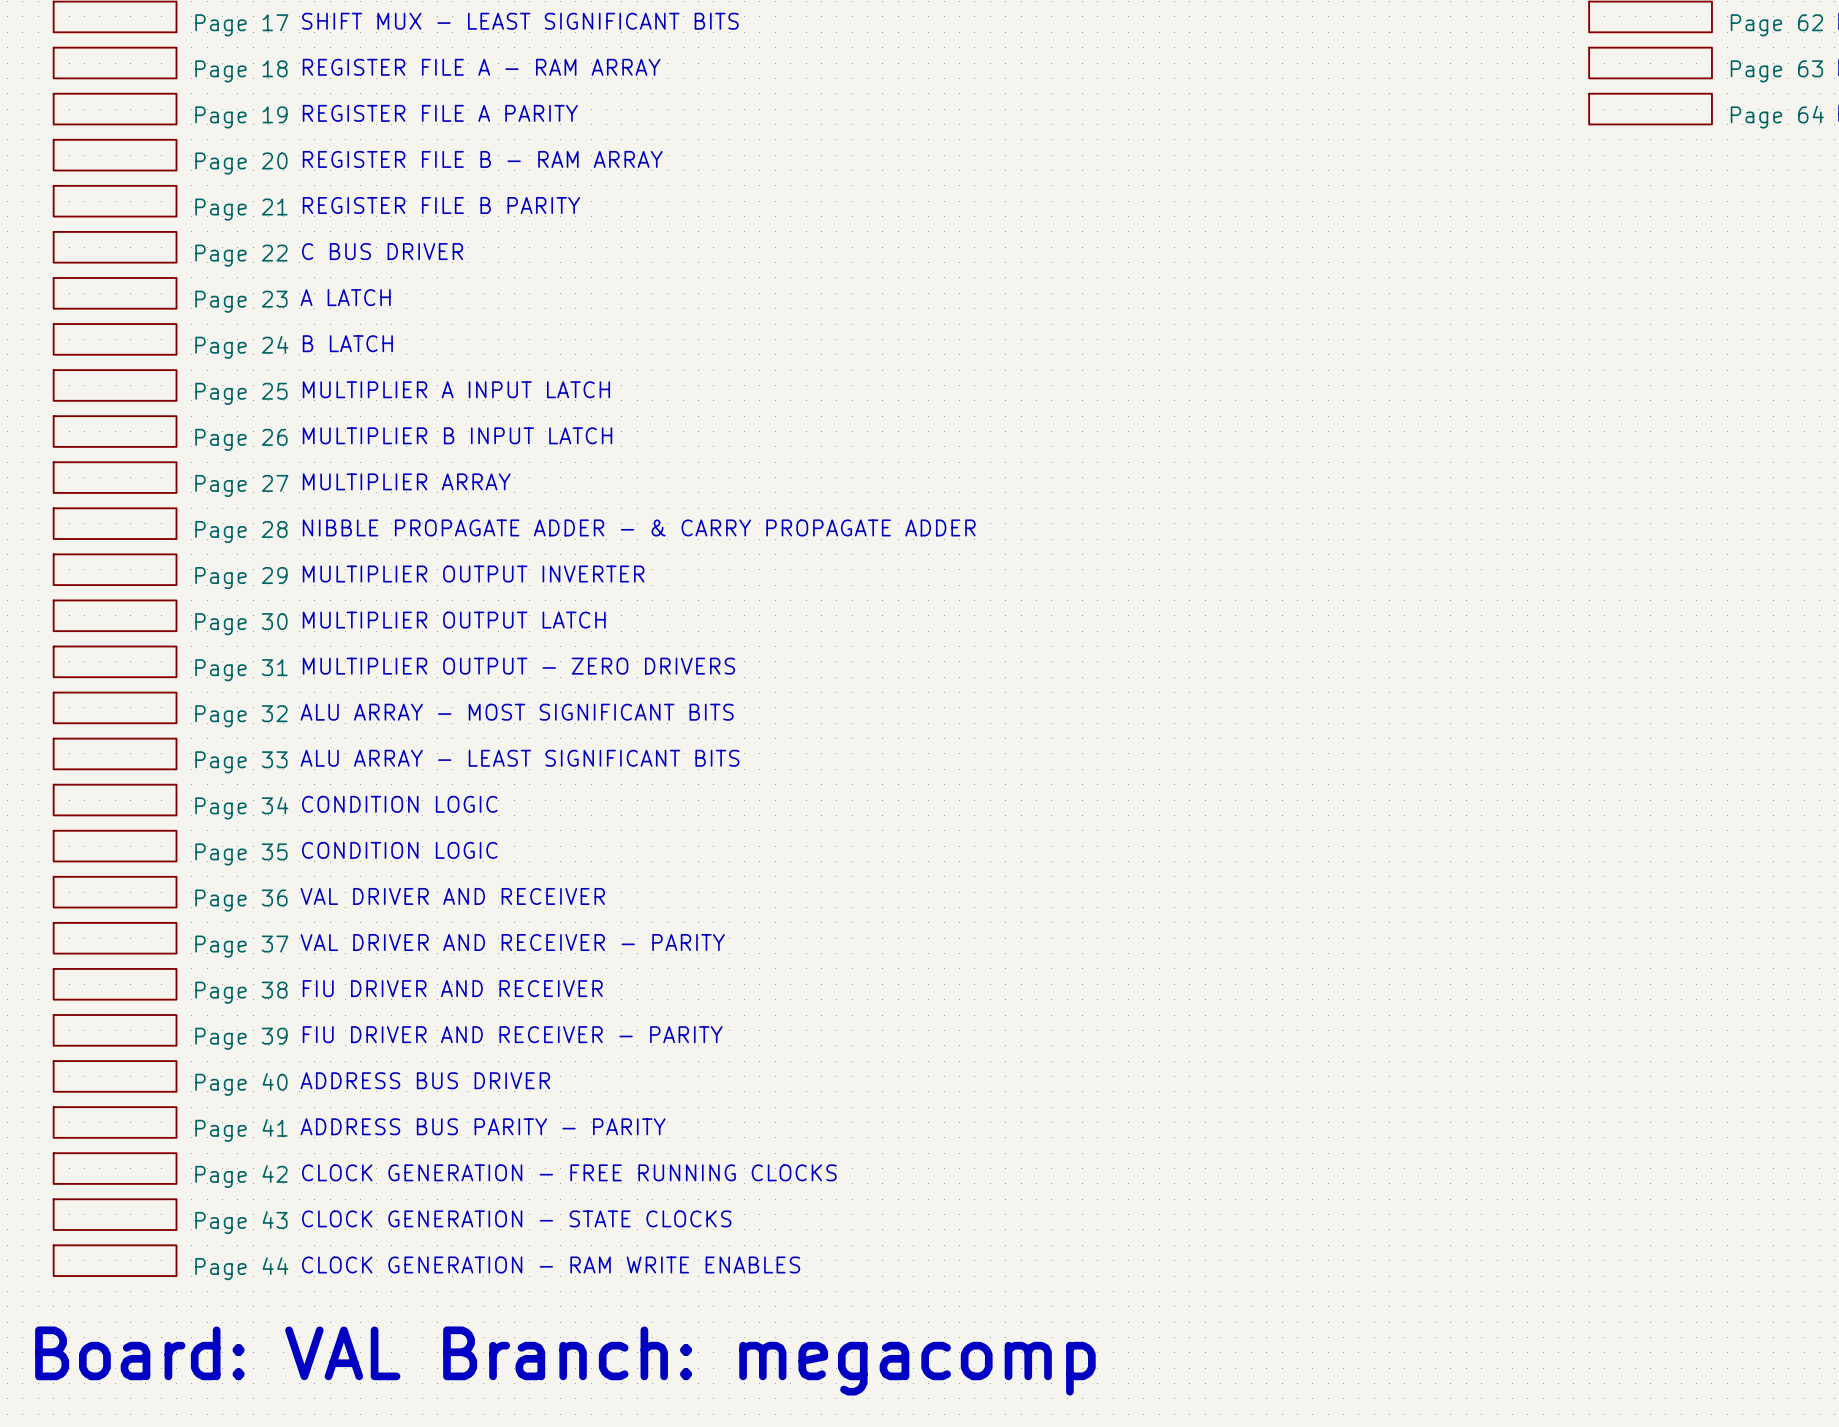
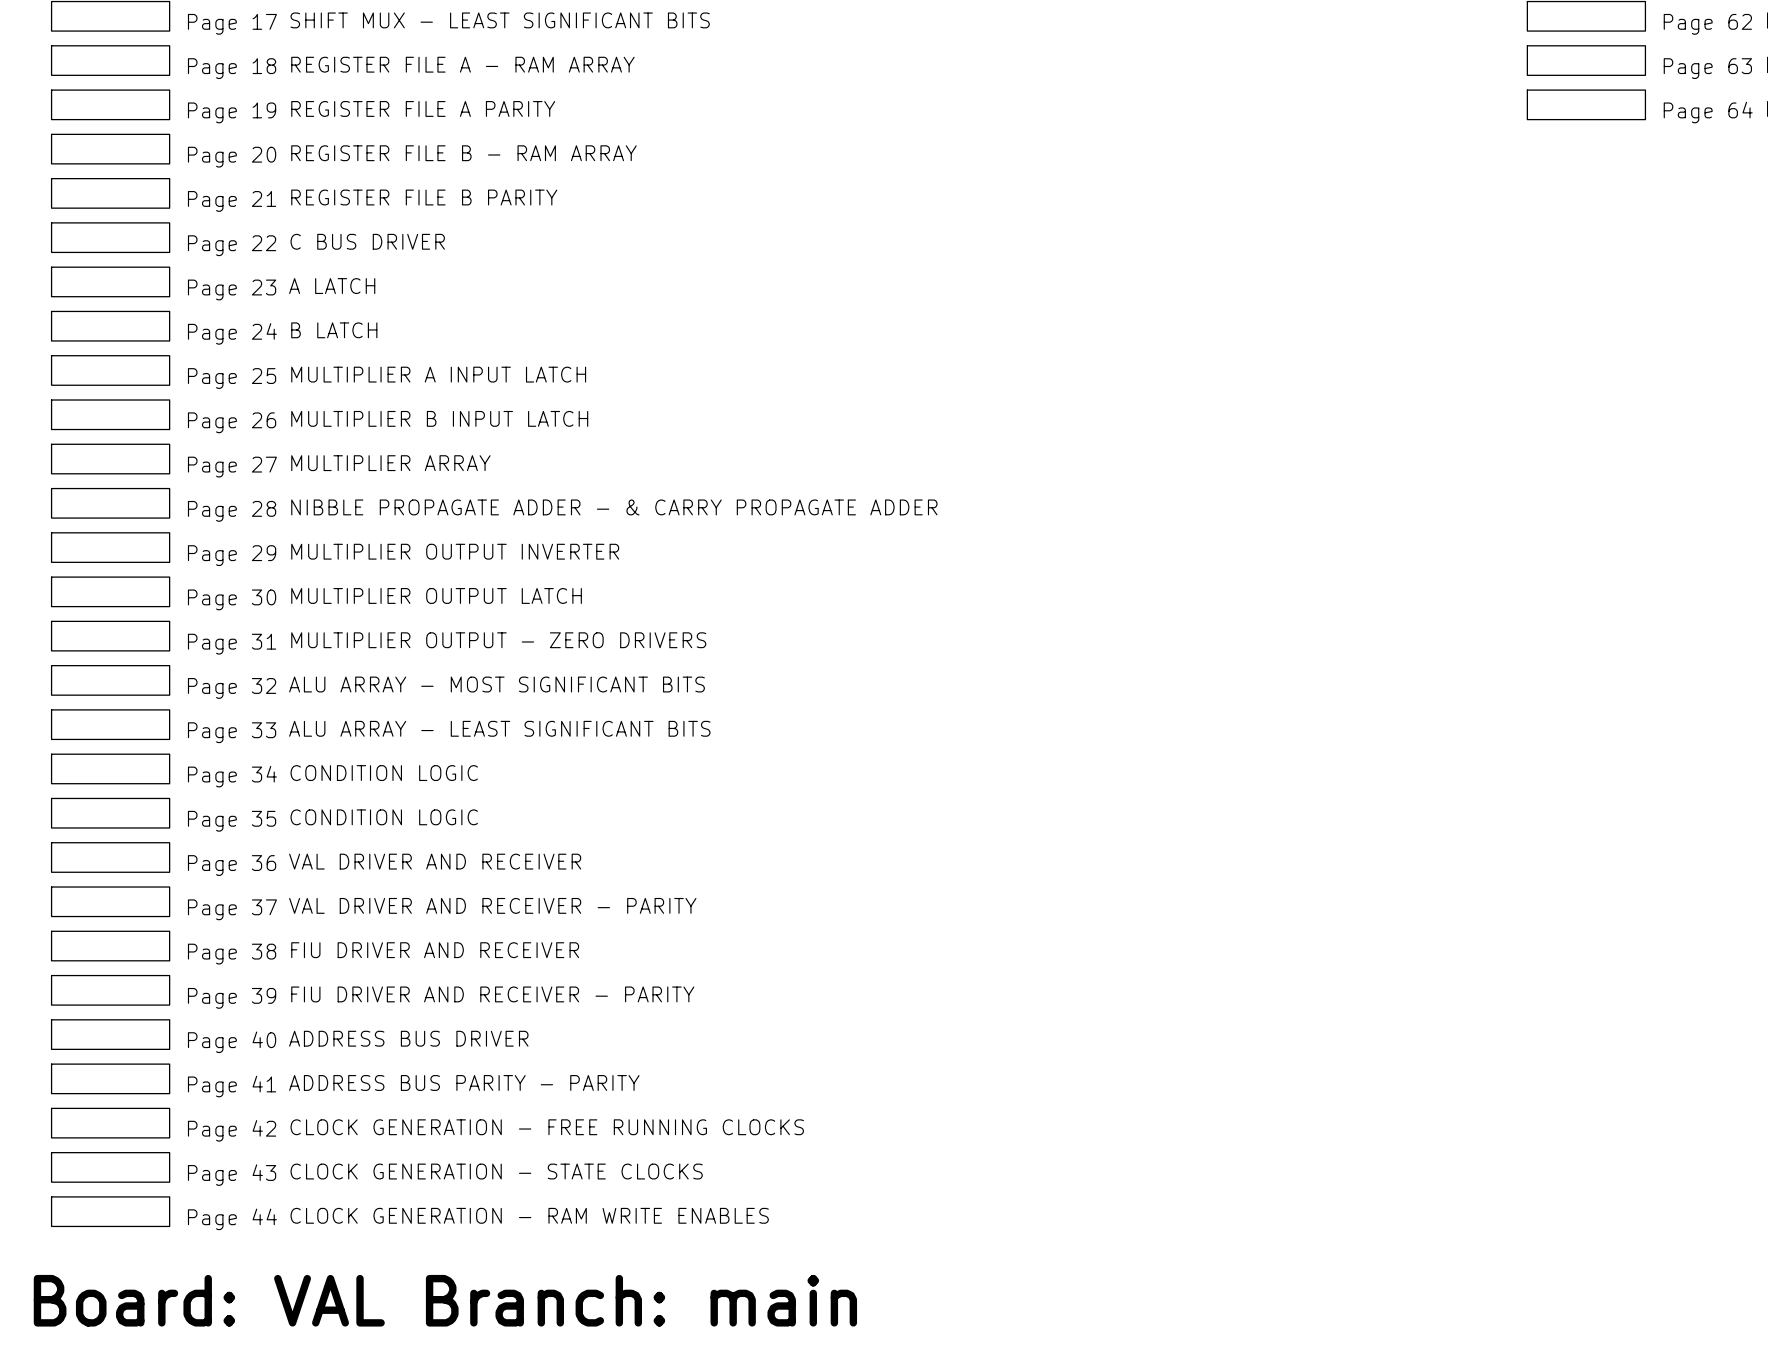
text: Board: VAL Branch: megacomp (565, 1361) -> Board: VAL Branch: main (445, 1300)

